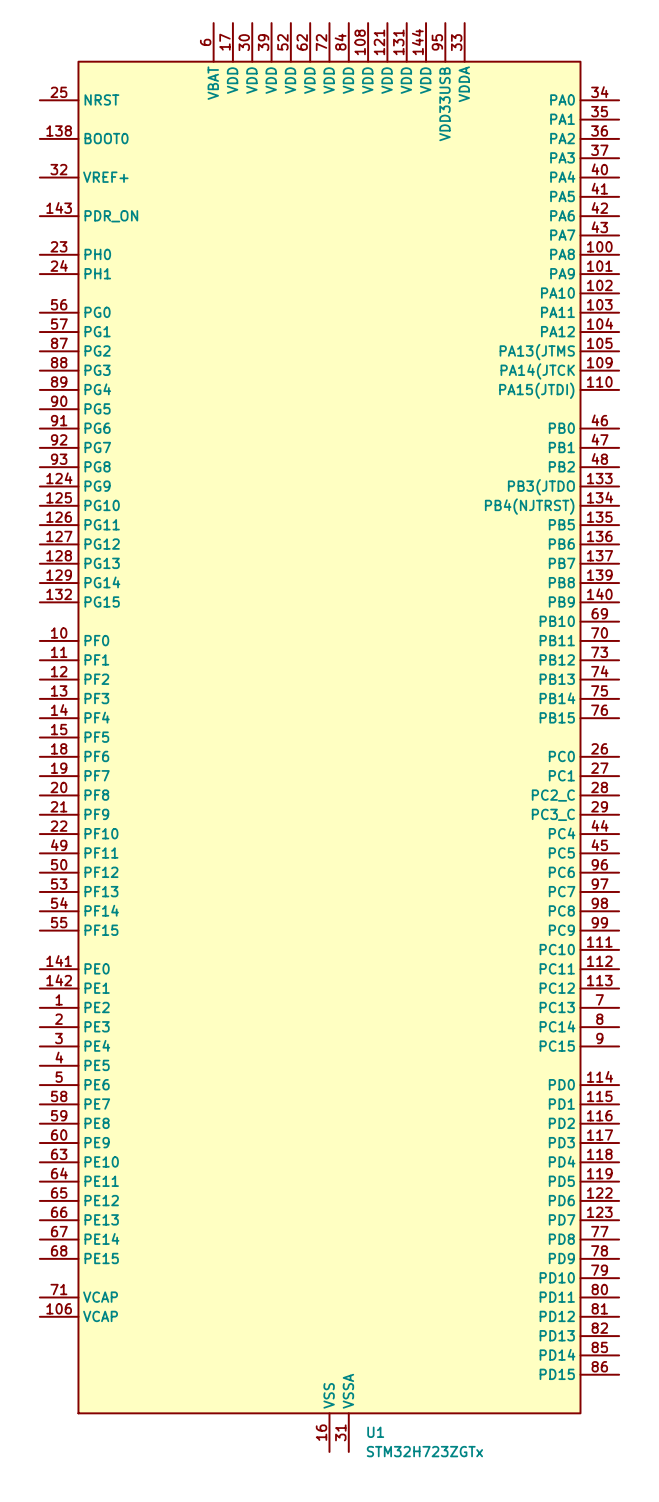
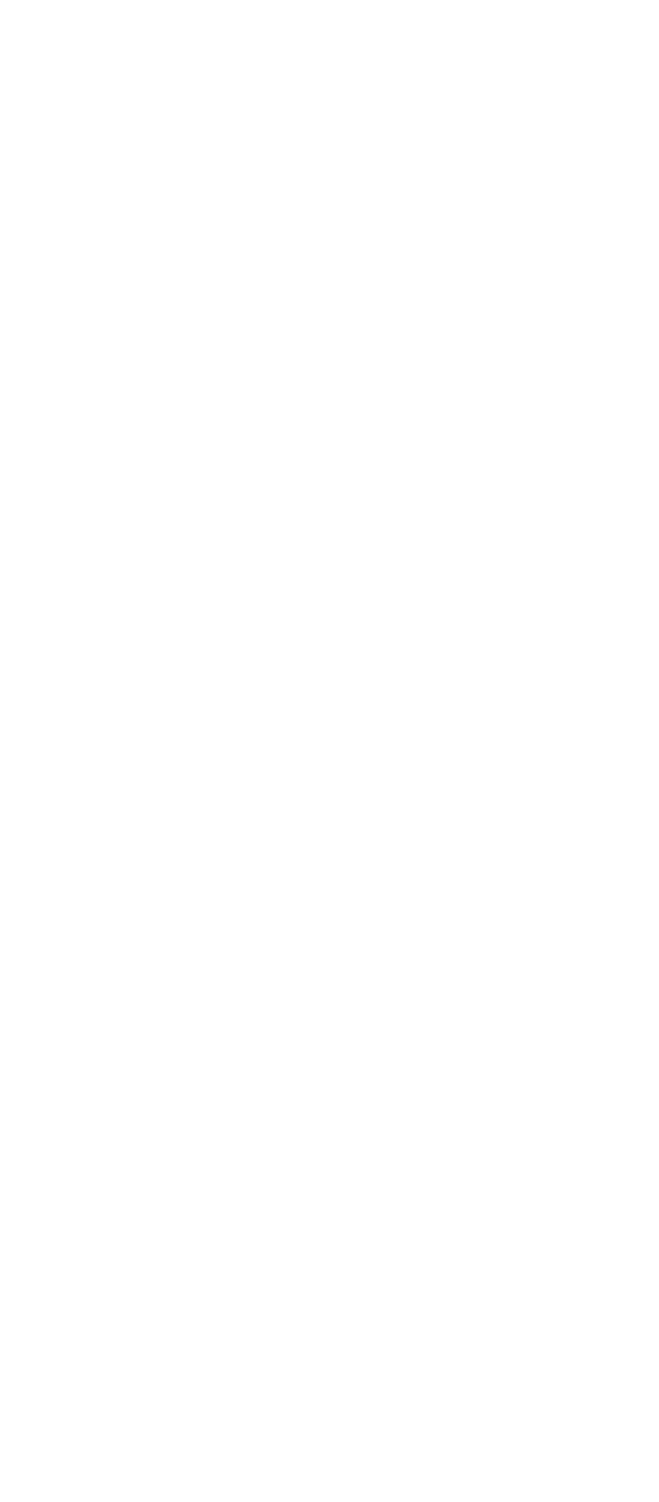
U1: STM32H723ZGTx (329, 737) -> none

